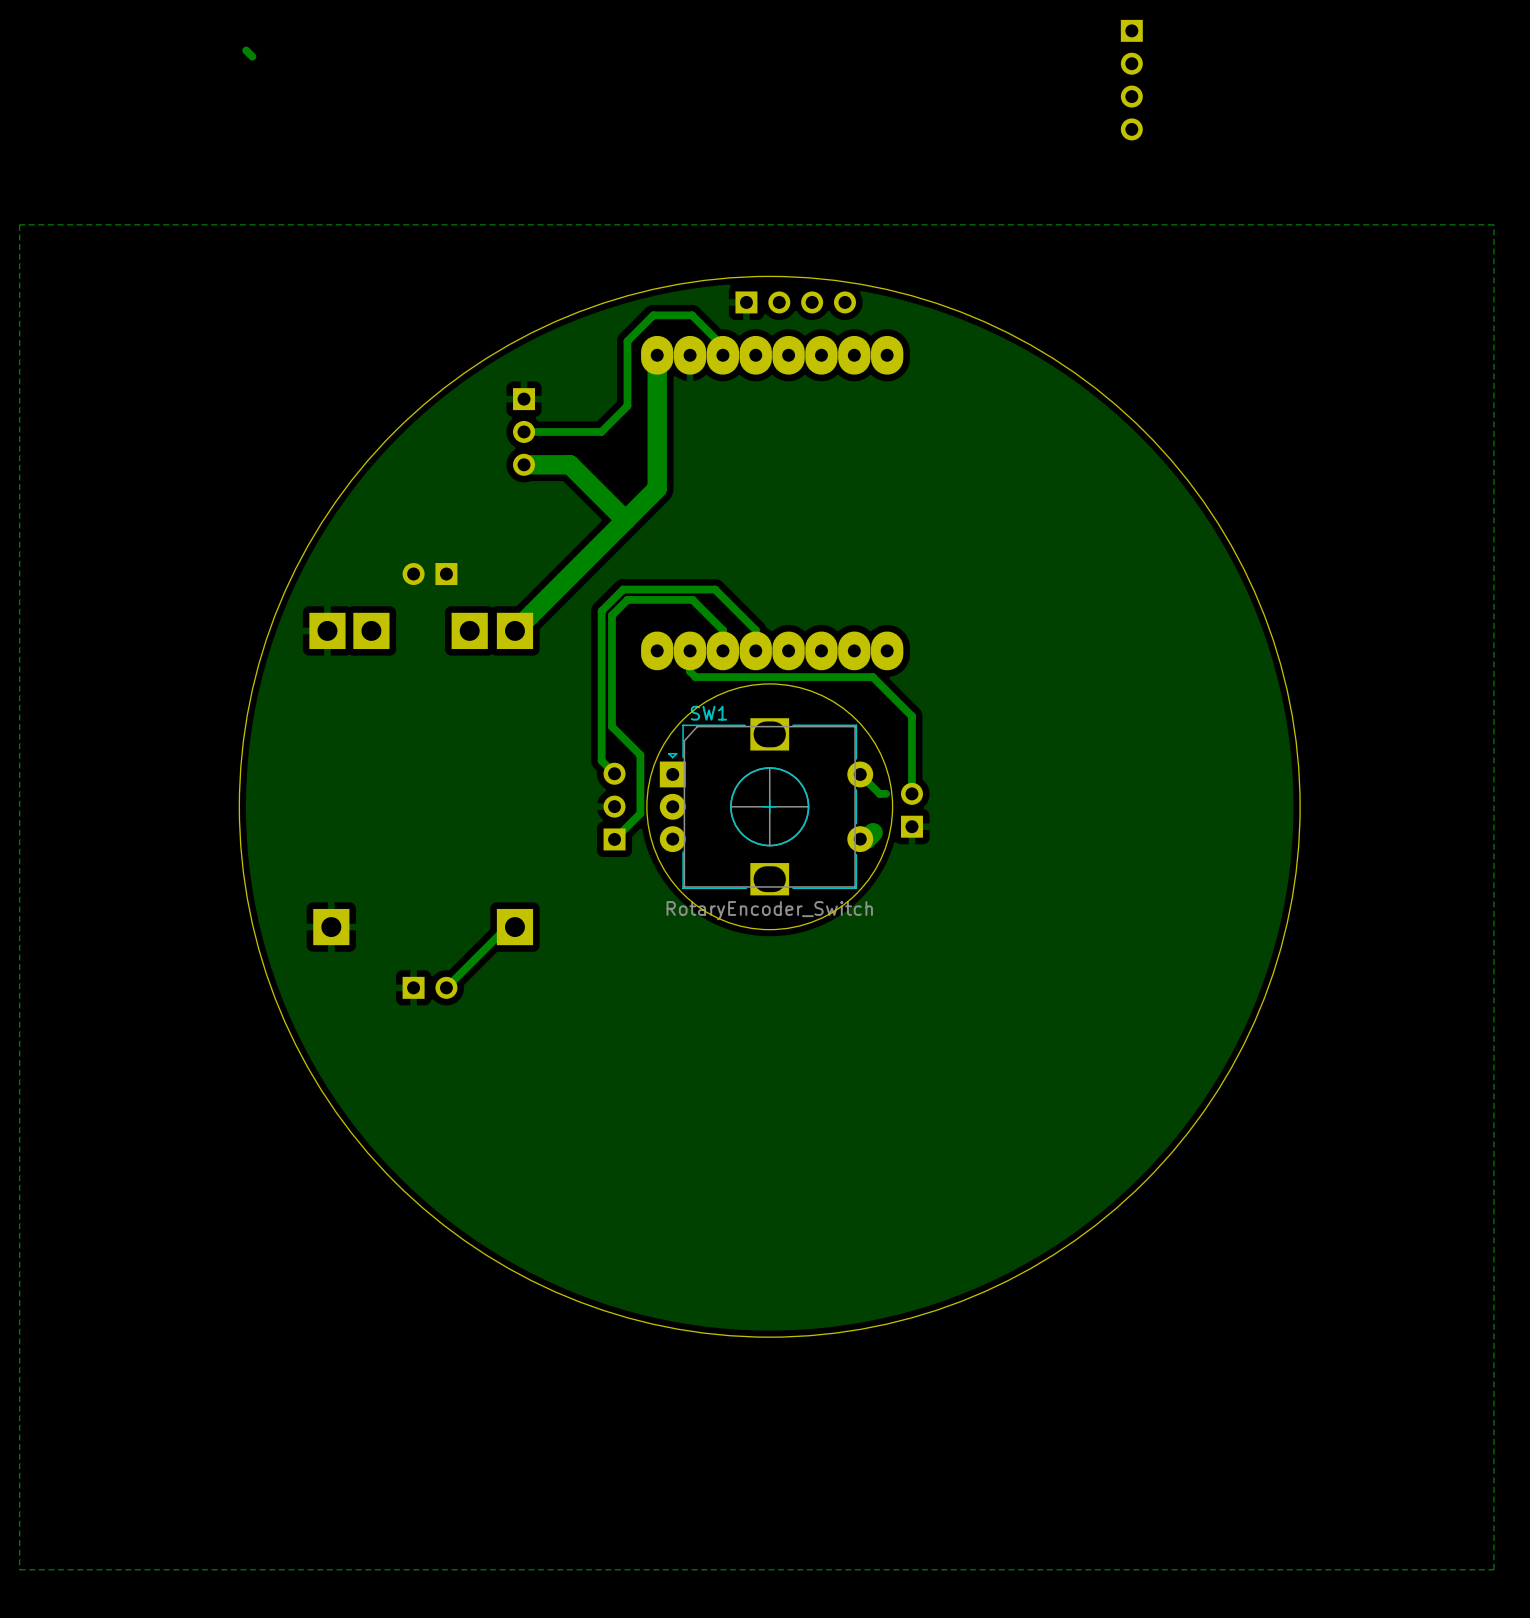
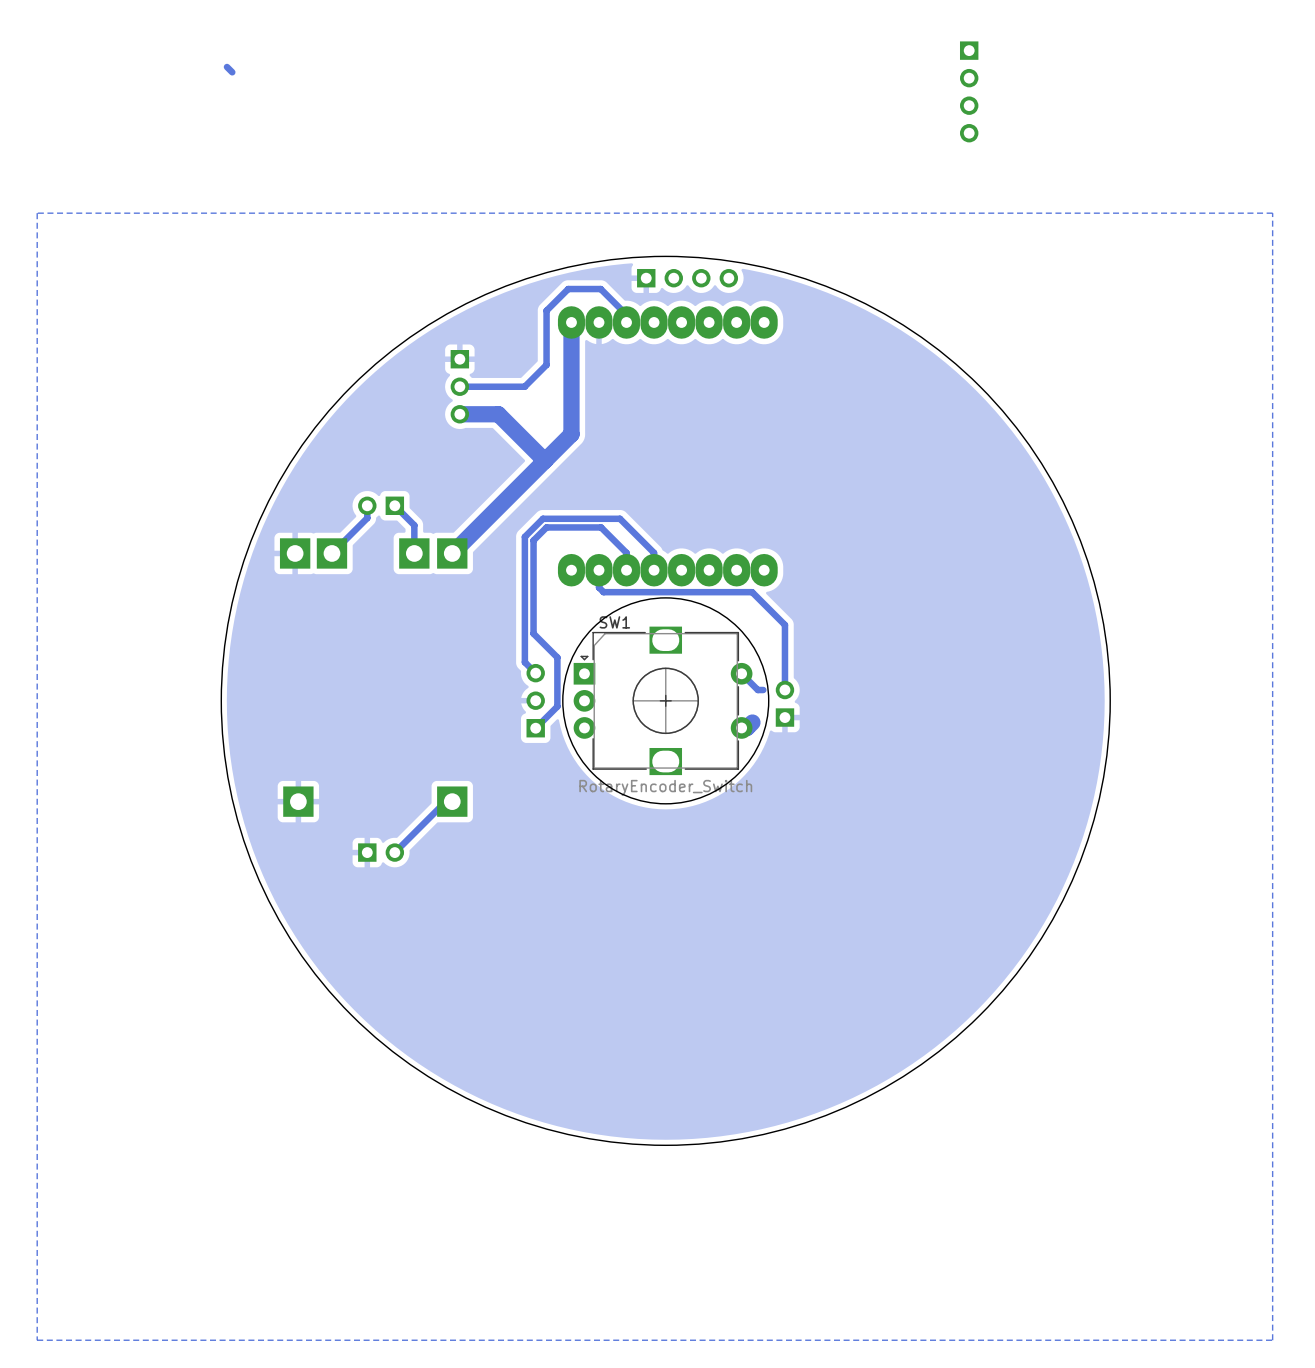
bottom track: none -> (367, 505) (367, 518) (331, 553)
bottom track: none -> (394, 505) (414, 525) (414, 553)

